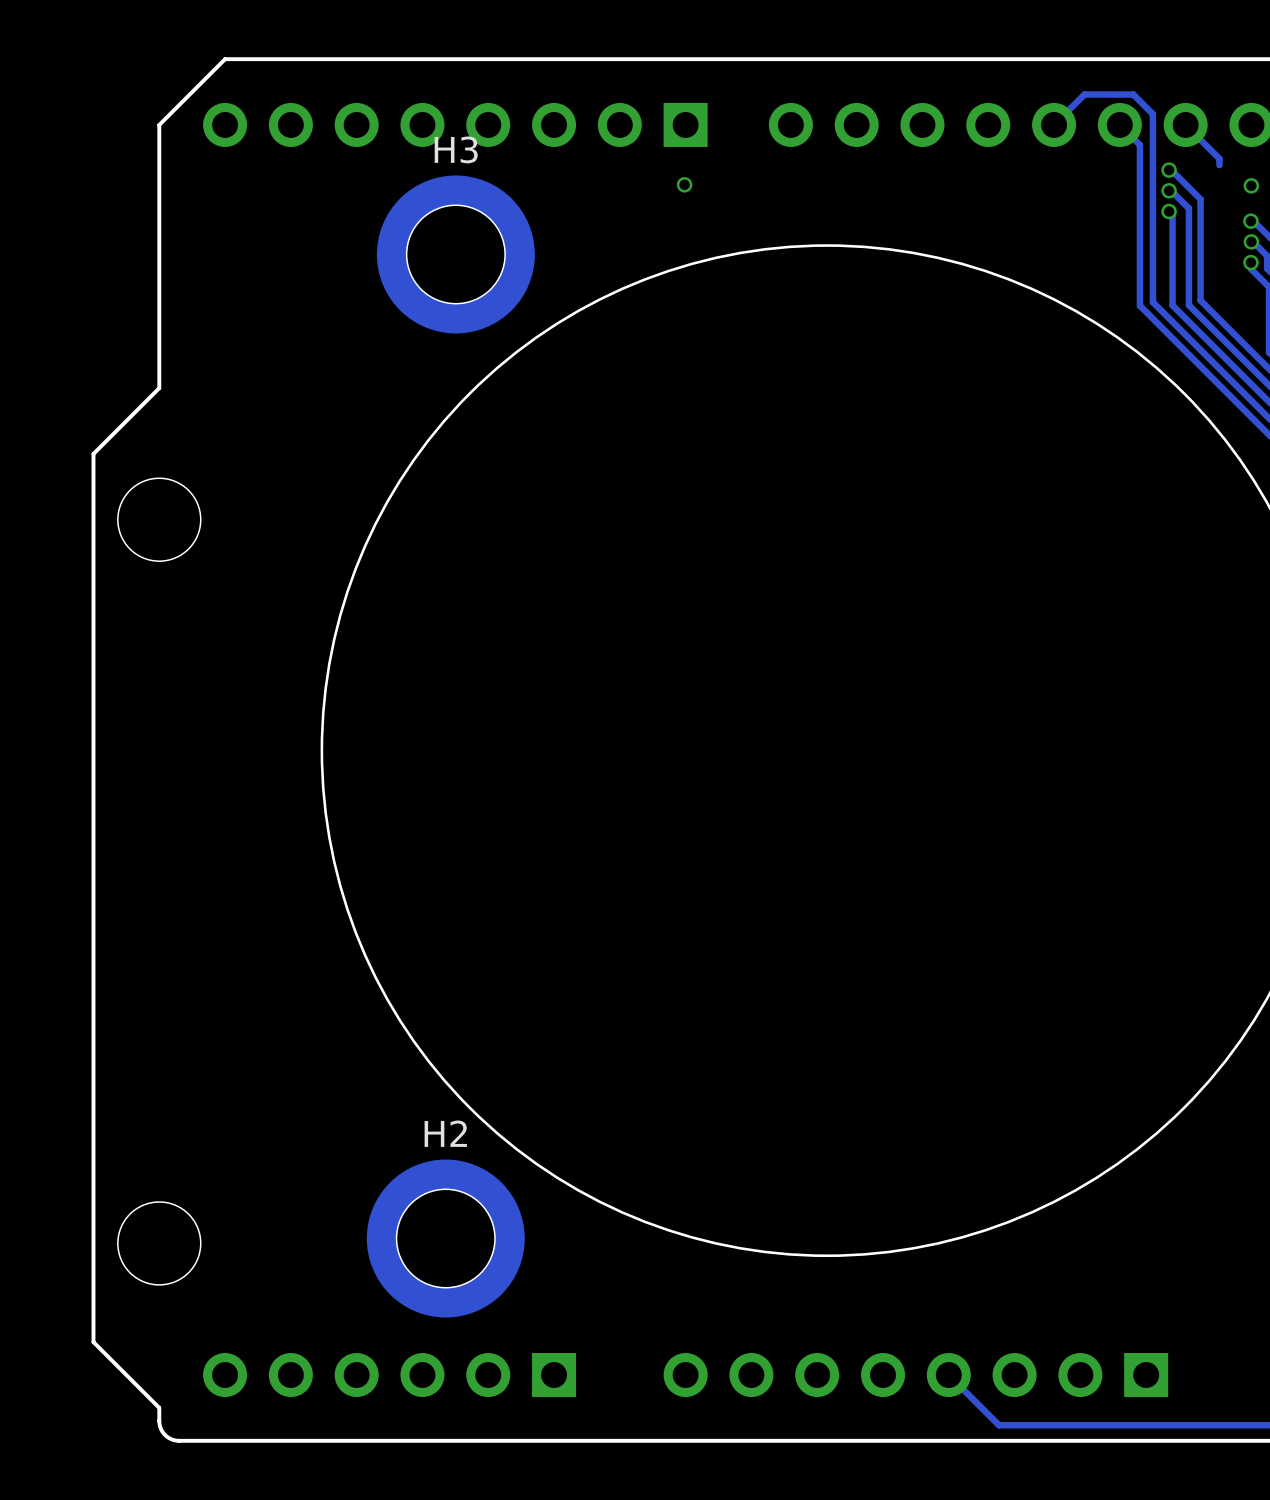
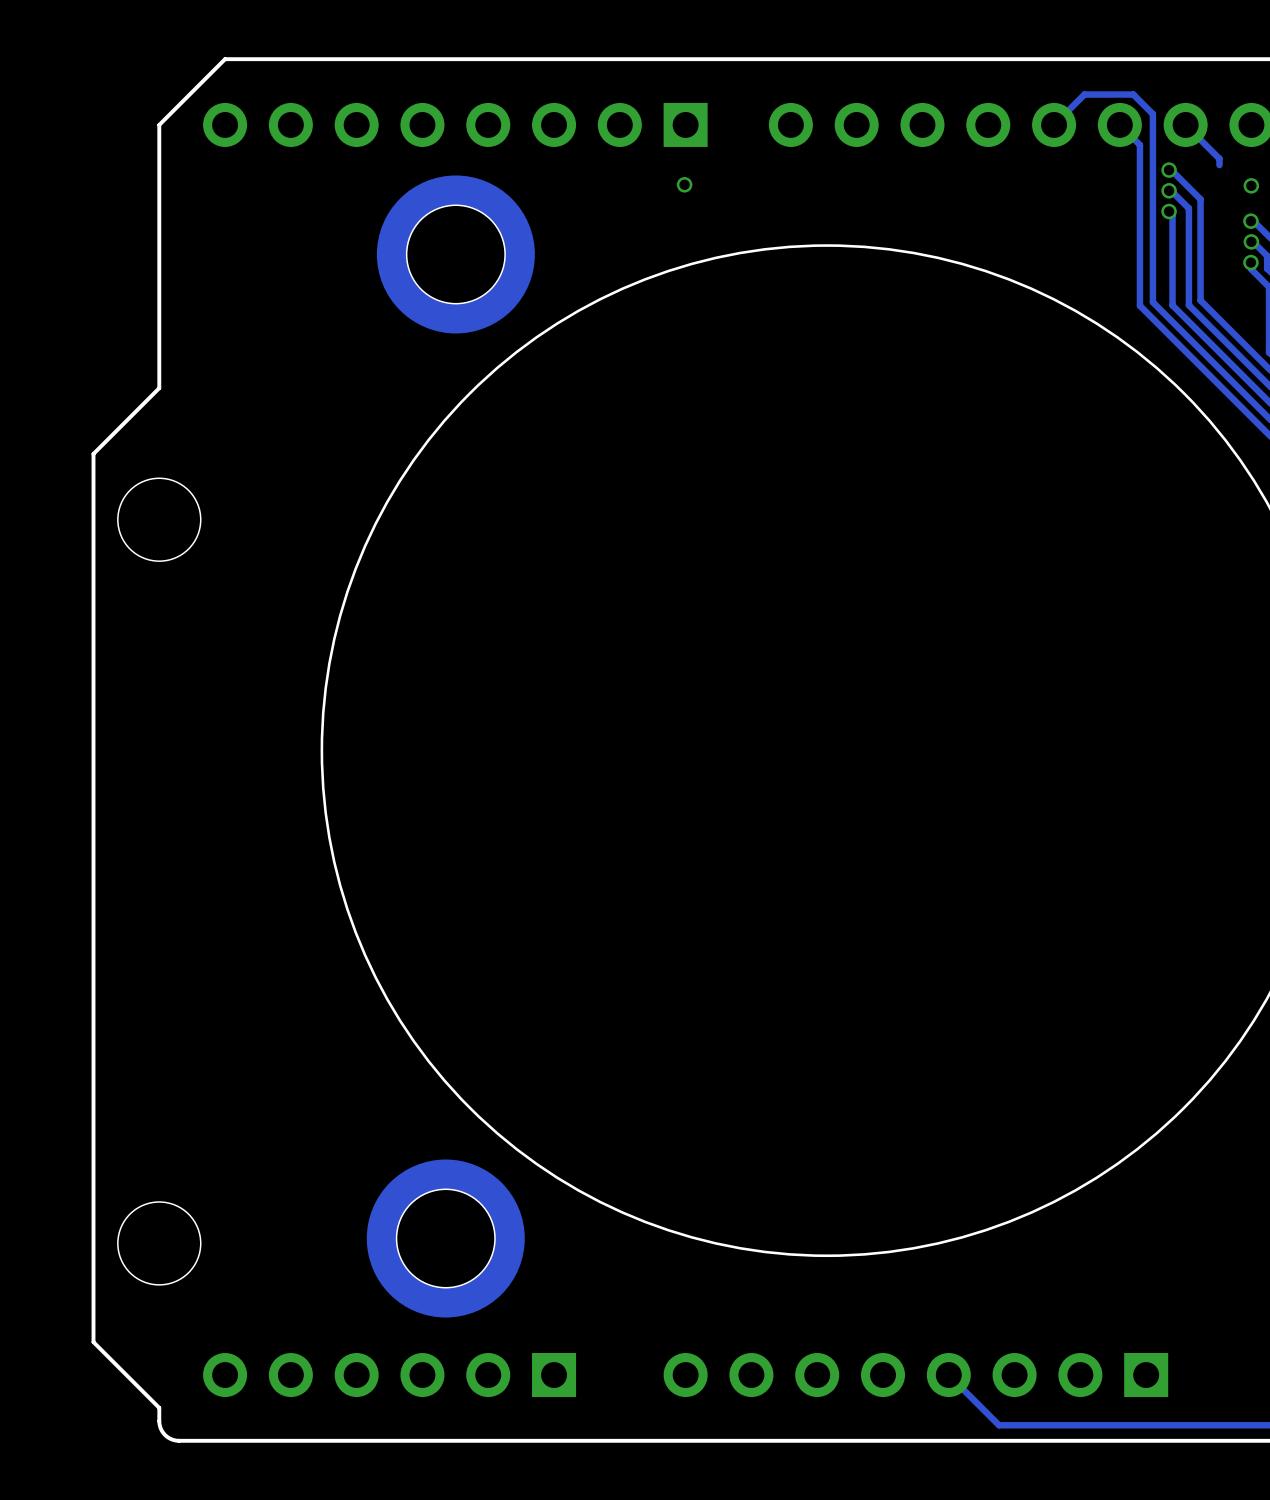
H3 name: H3 (456, 149) -> none
H2 name: H2 (445, 1133) -> none

